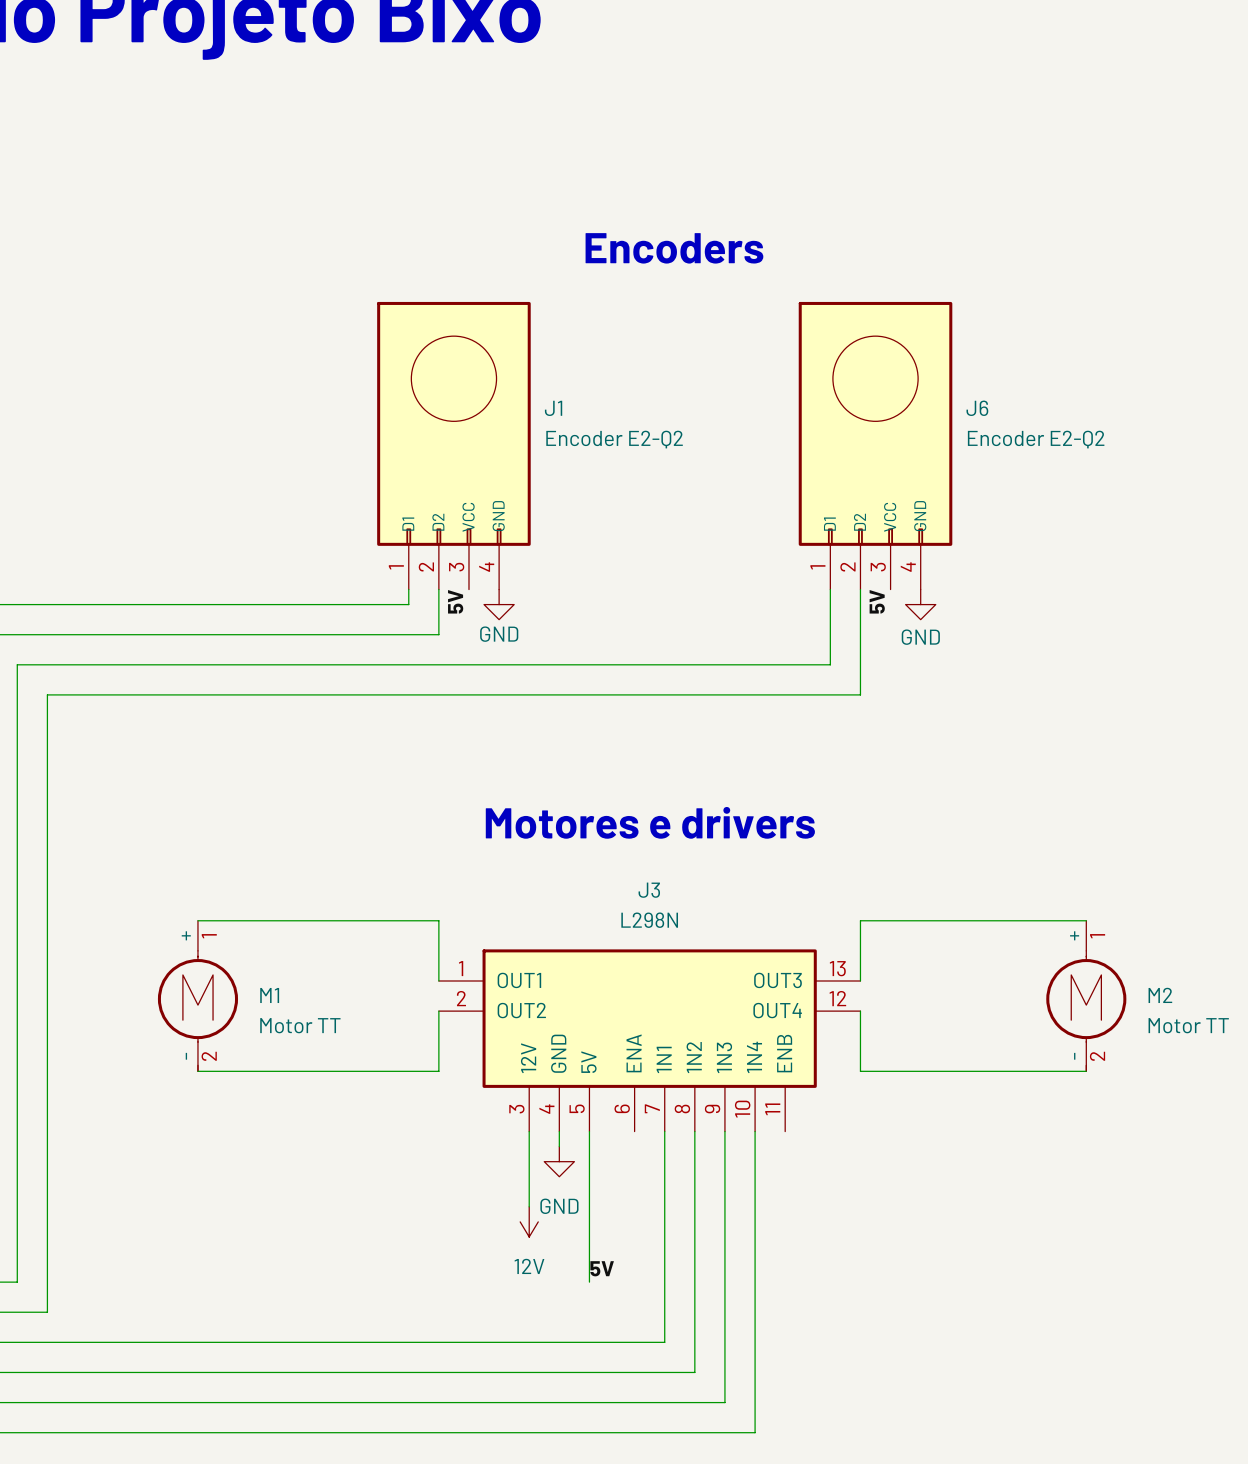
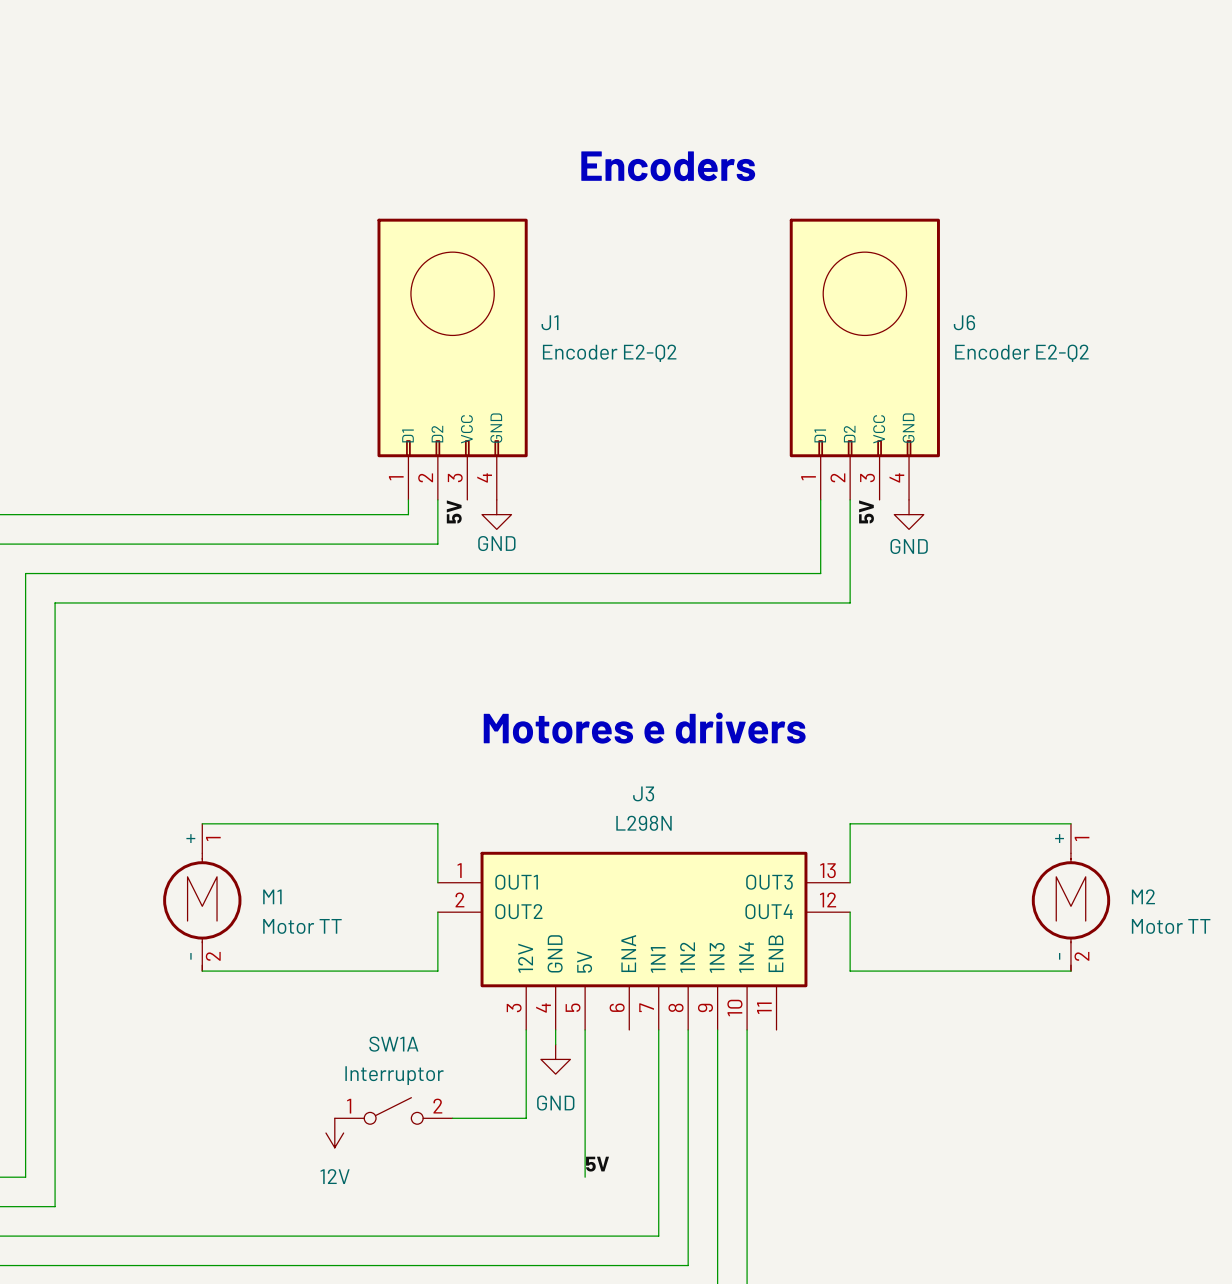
wire: none -> (526, 1103) (526, 1118) (452, 1118)
SW1A: none -> Interruptor (393, 1110)
power symbol position: 12V (529, 1221) -> 12V (334, 1133)

